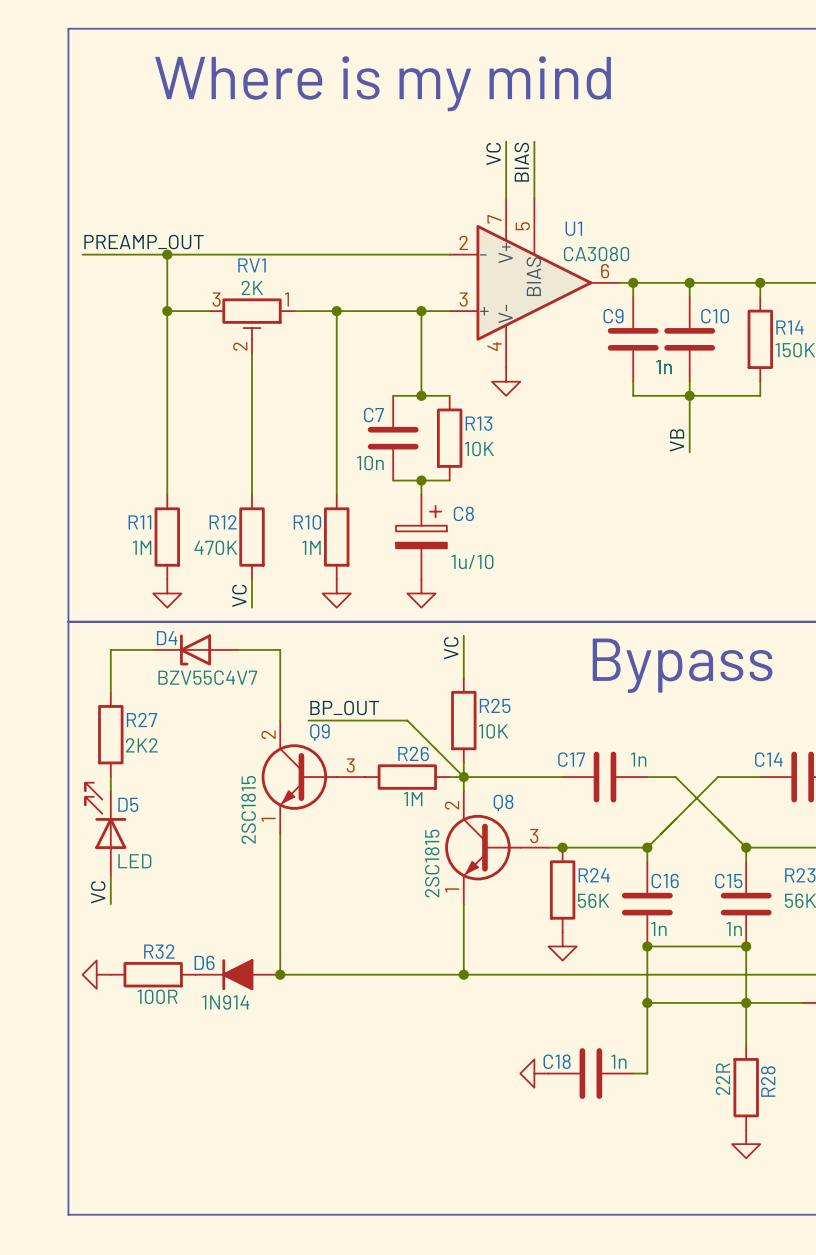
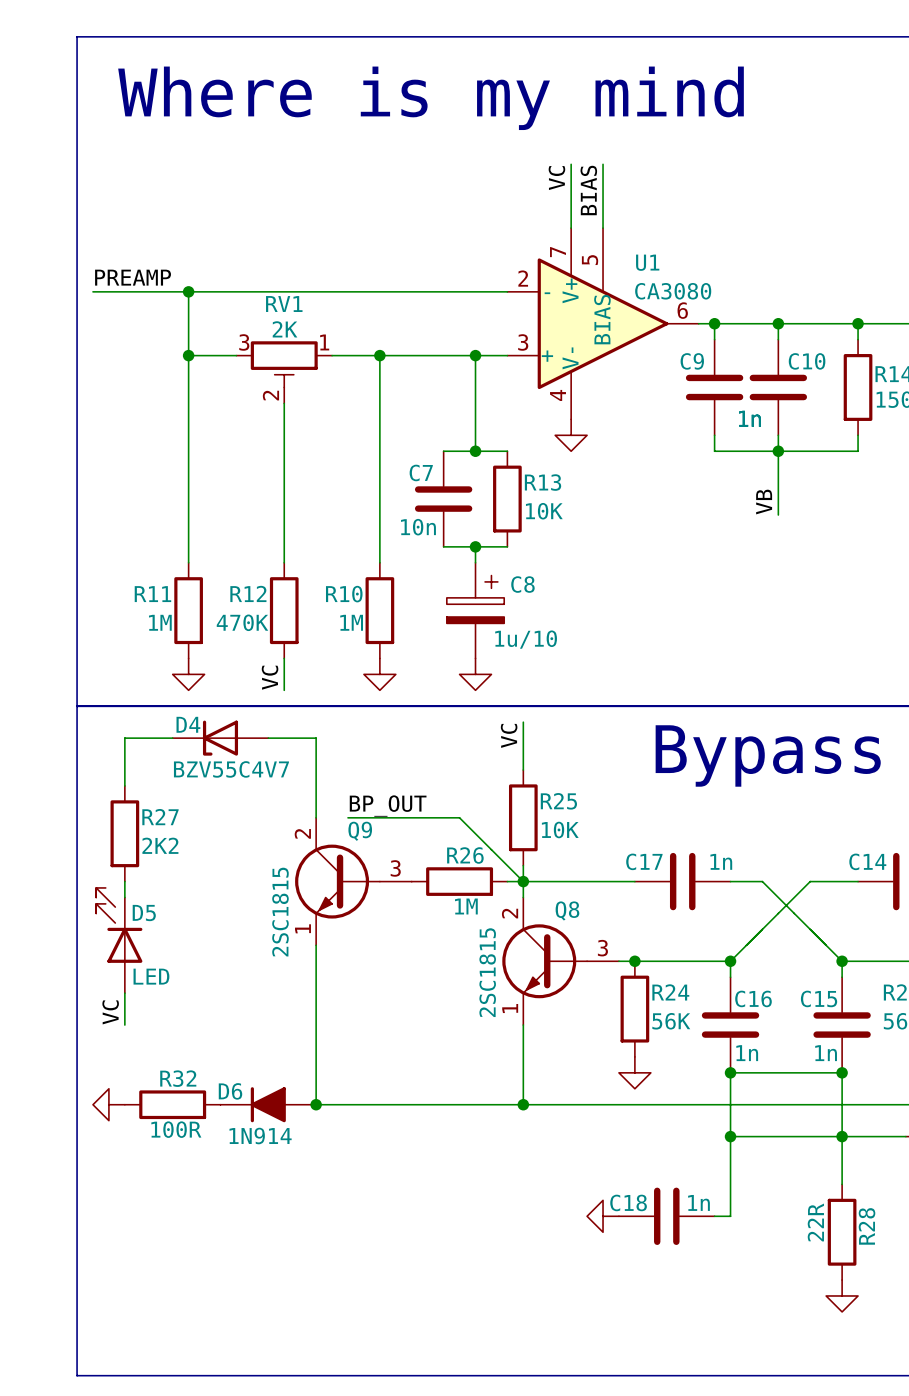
label: PREAMP_OUT (143, 242) -> PREAMP (133, 277)

